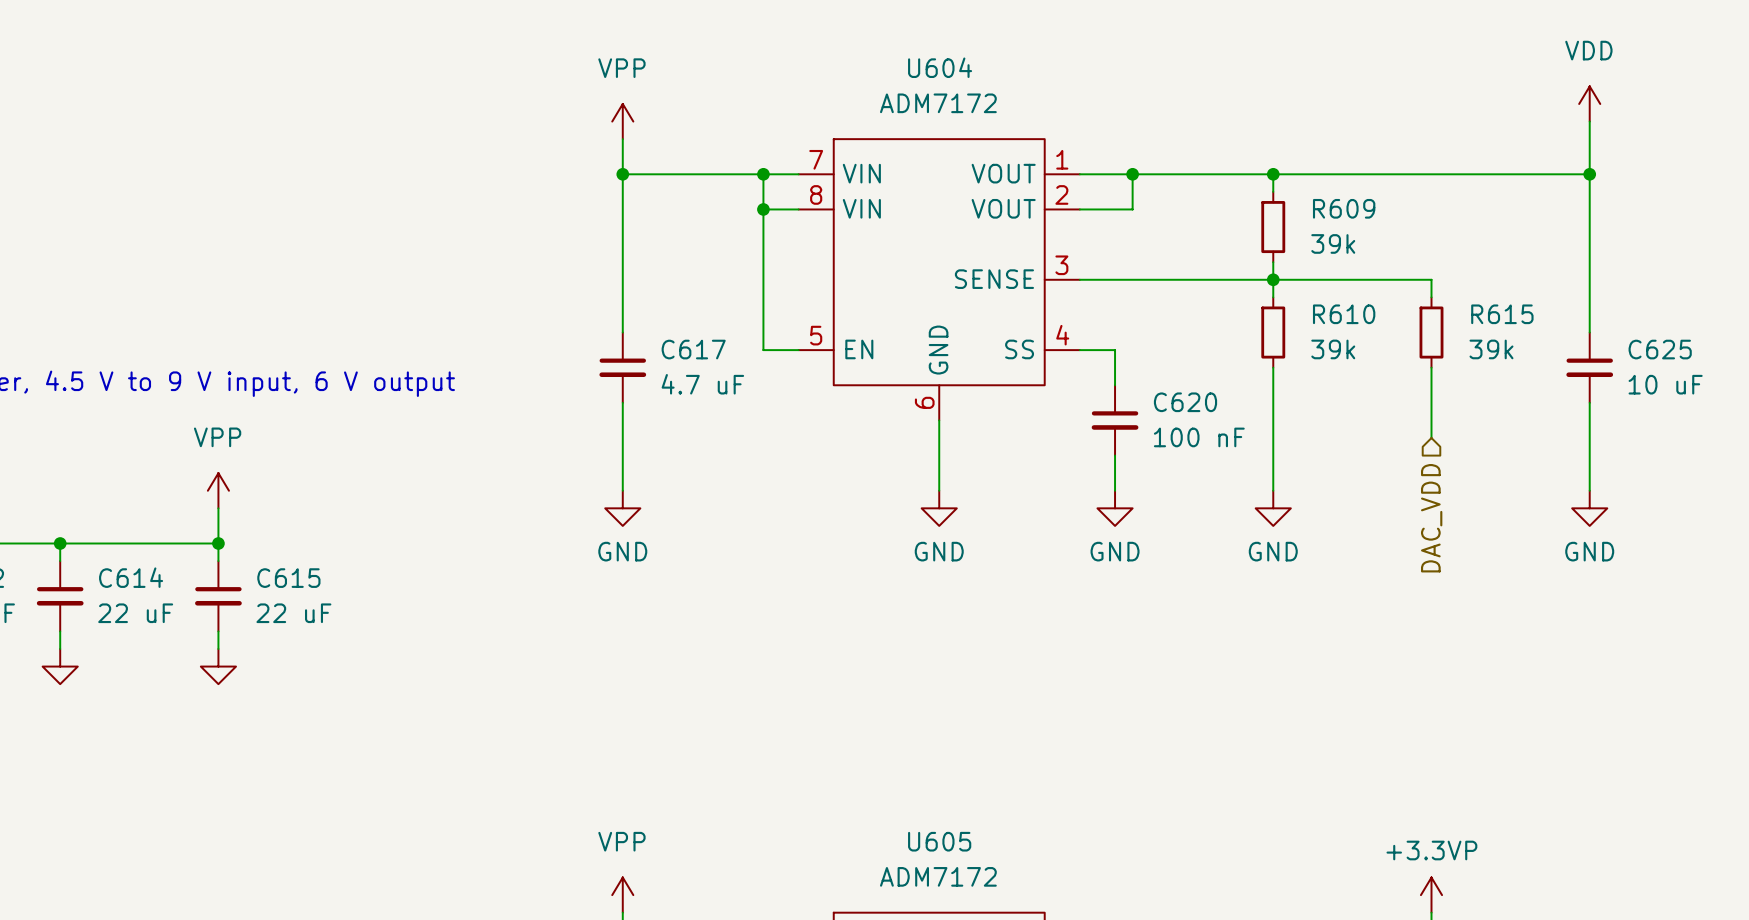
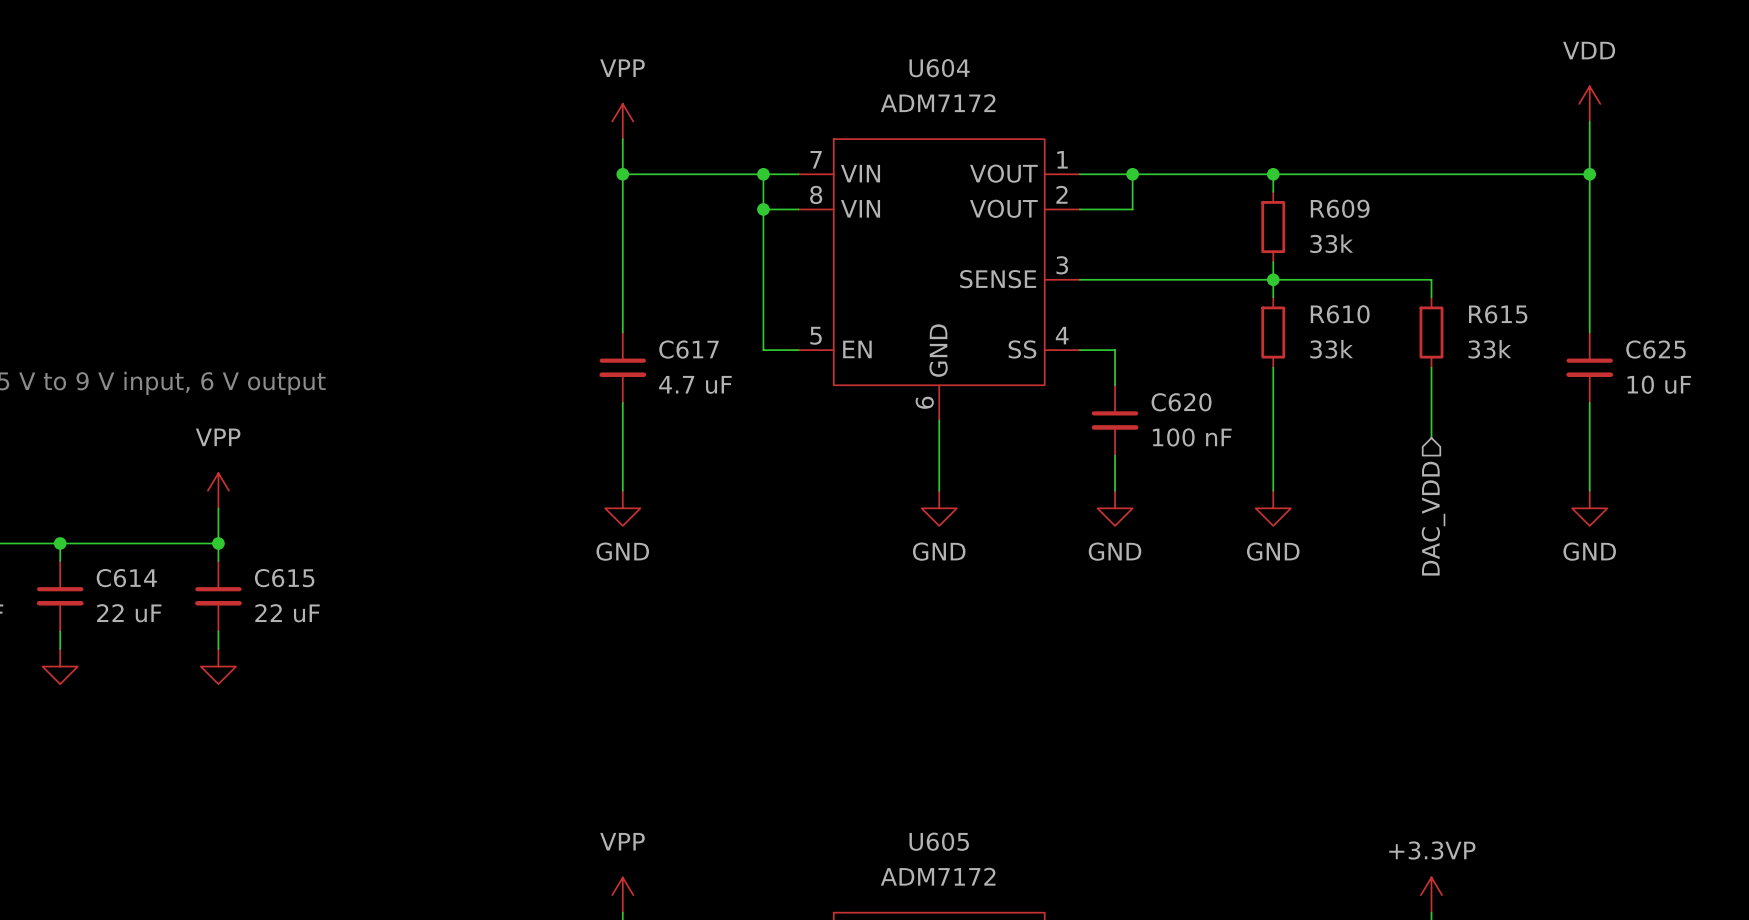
R609 value: 39k (1333, 243) -> 33k (1331, 243)
R610 value: 39k (1333, 349) -> 33k (1331, 349)
R615 value: 39k (1491, 349) -> 33k (1489, 349)

